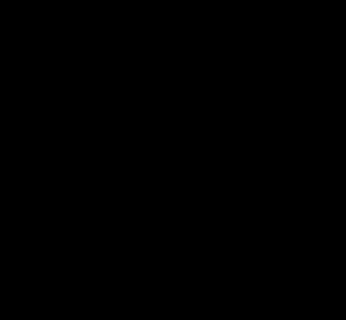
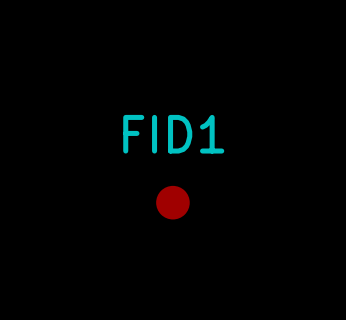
FID1: none -> (172, 202)

